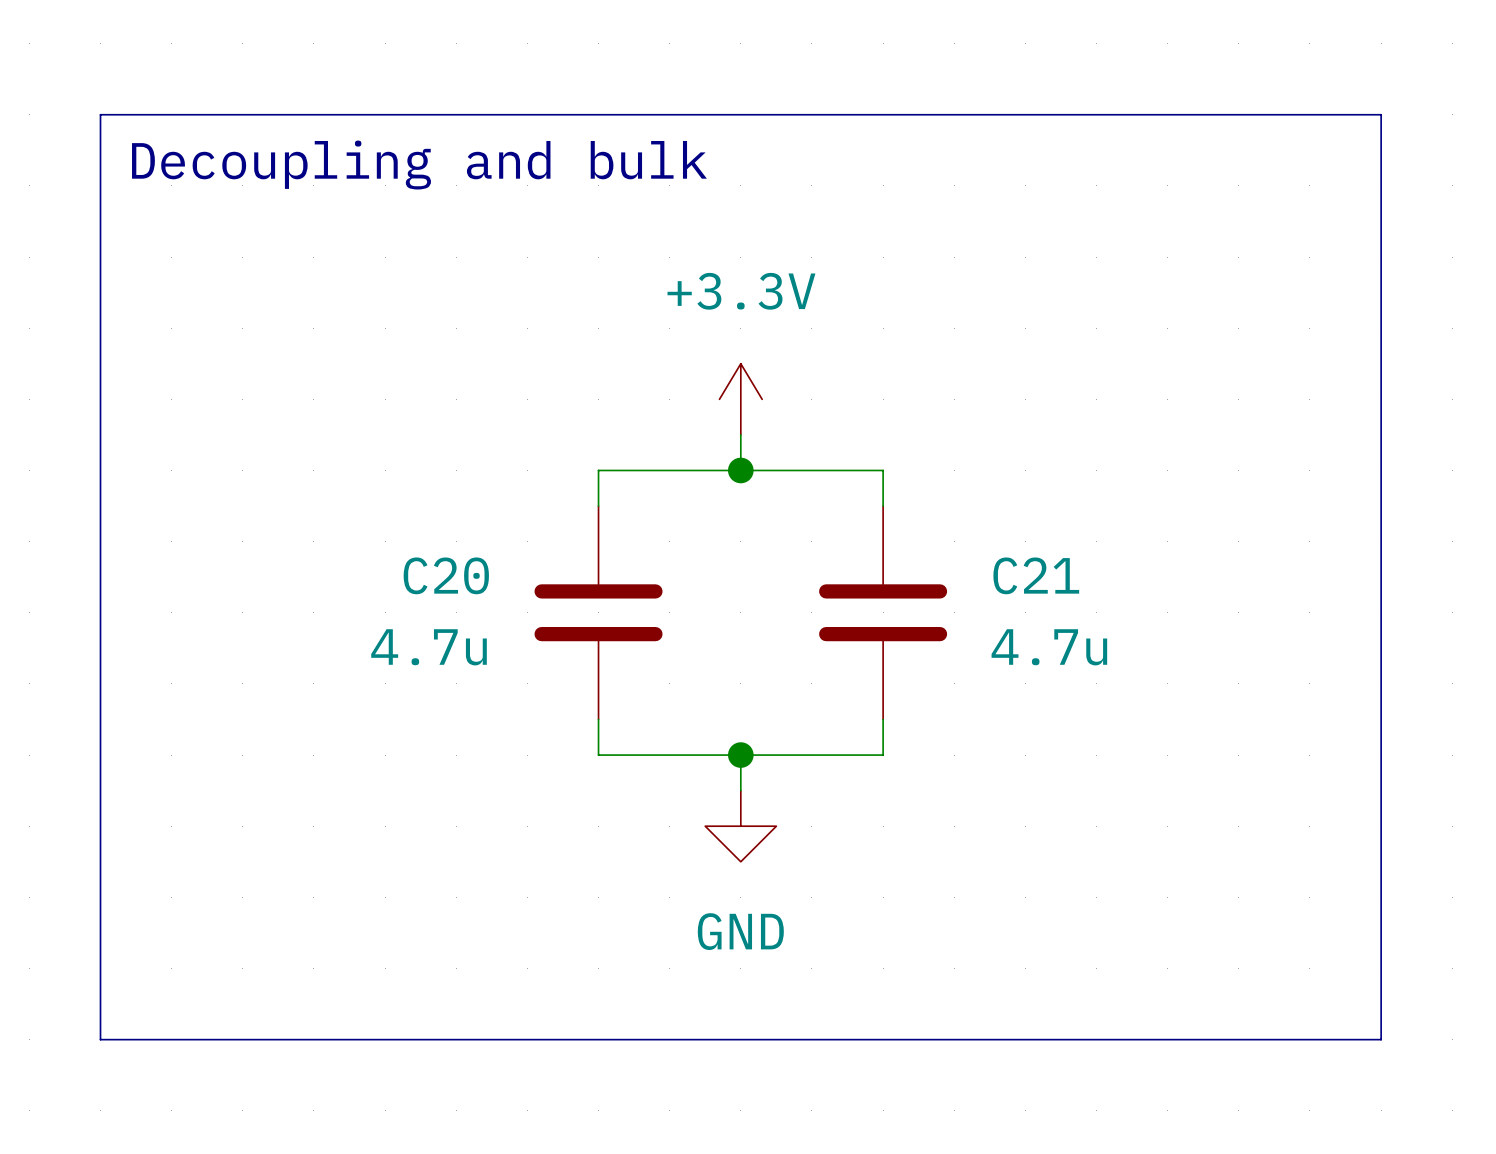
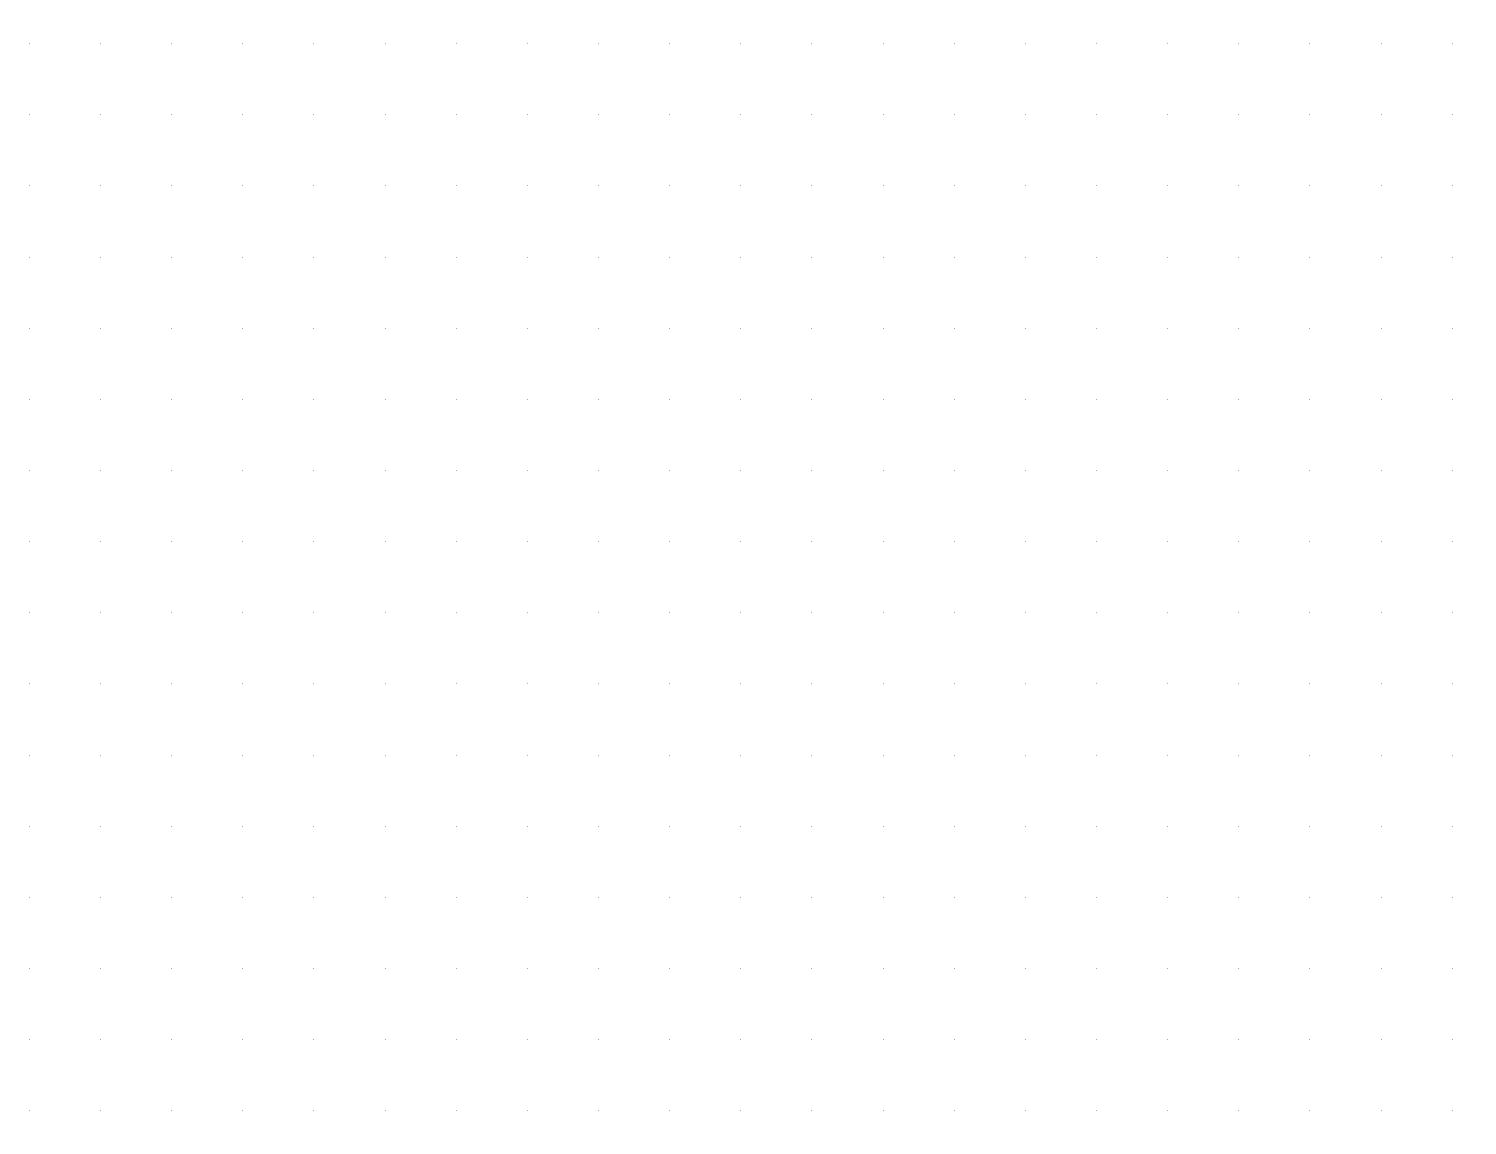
line: (100, 114) (1381, 114) (1381, 1039) (100, 1039) (100, 114) -> none
text: Decoupling and bulk (419, 165) -> none
power symbol: +3.3V (740, 399) -> none
wire: (740, 434) (740, 470) -> none
junction: (740, 470) -> none
wire: (598, 506) (598, 470) (883, 470) (883, 506) -> none
C20: 4.7u (598, 612) -> none
C21: 4.7u (883, 612) -> none
wire: (598, 719) (598, 755) (883, 755) (883, 719) -> none
wire: (740, 755) (740, 790) -> none
junction: (740, 755) -> none
power symbol: GND (740, 826) -> none

